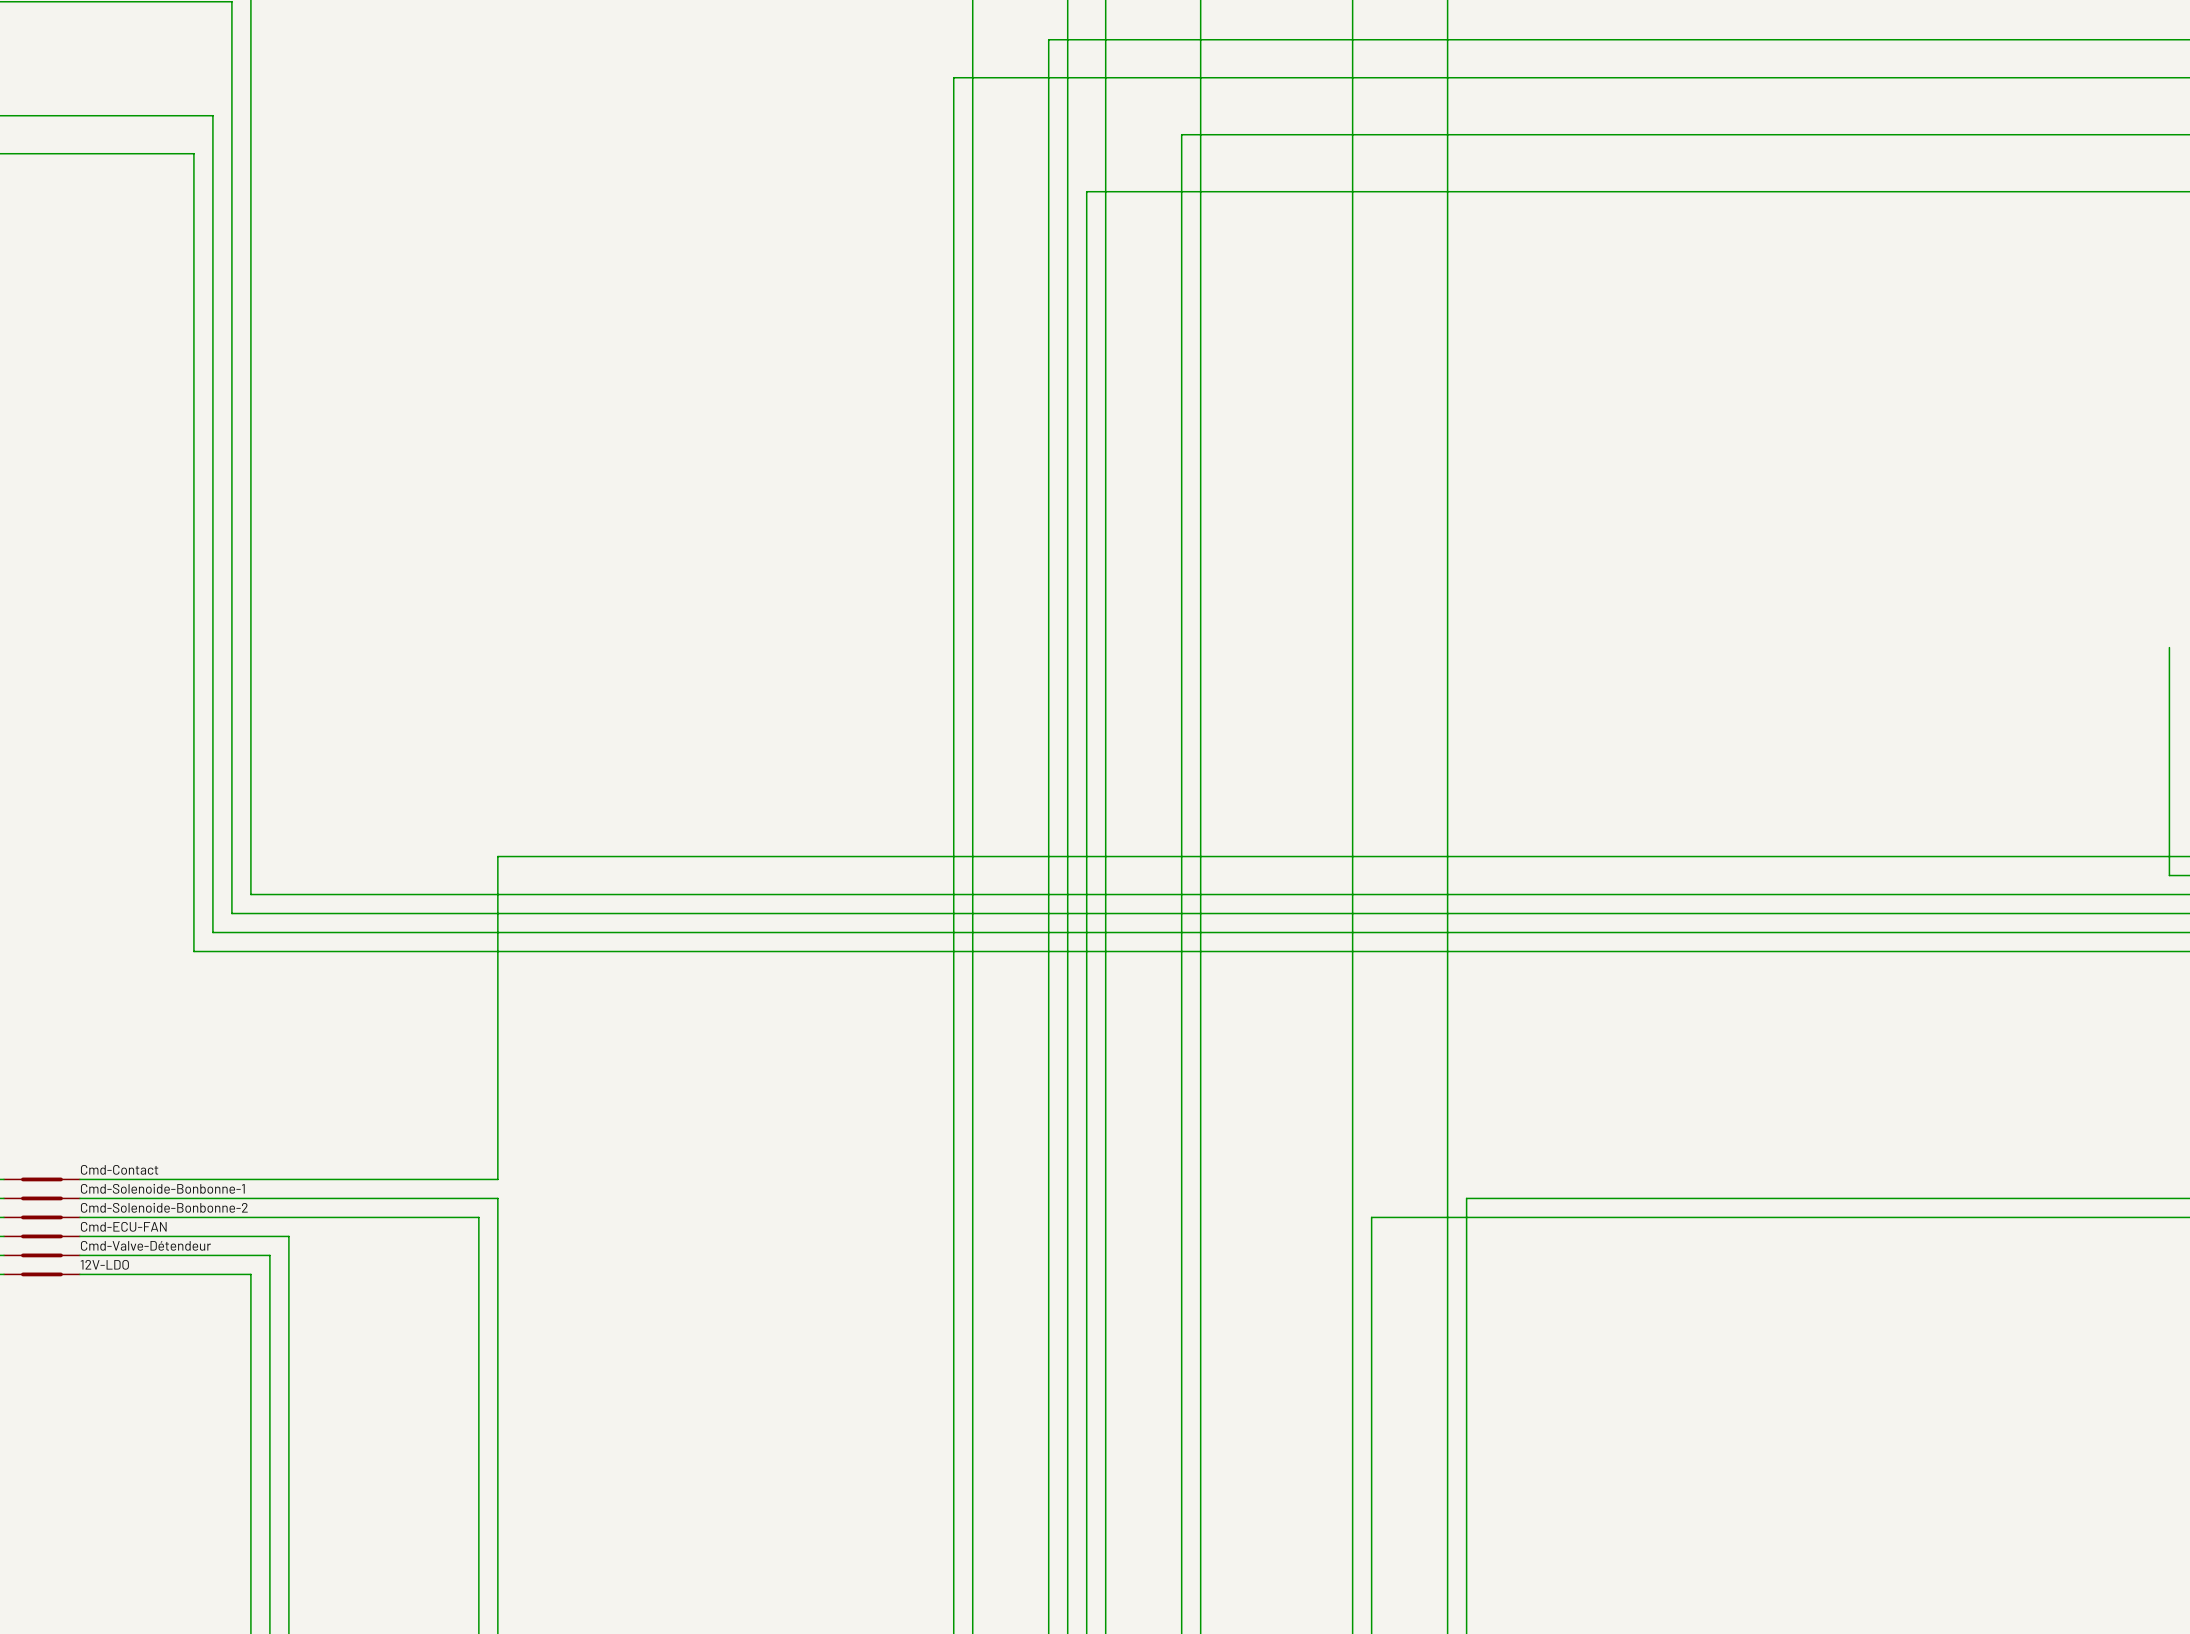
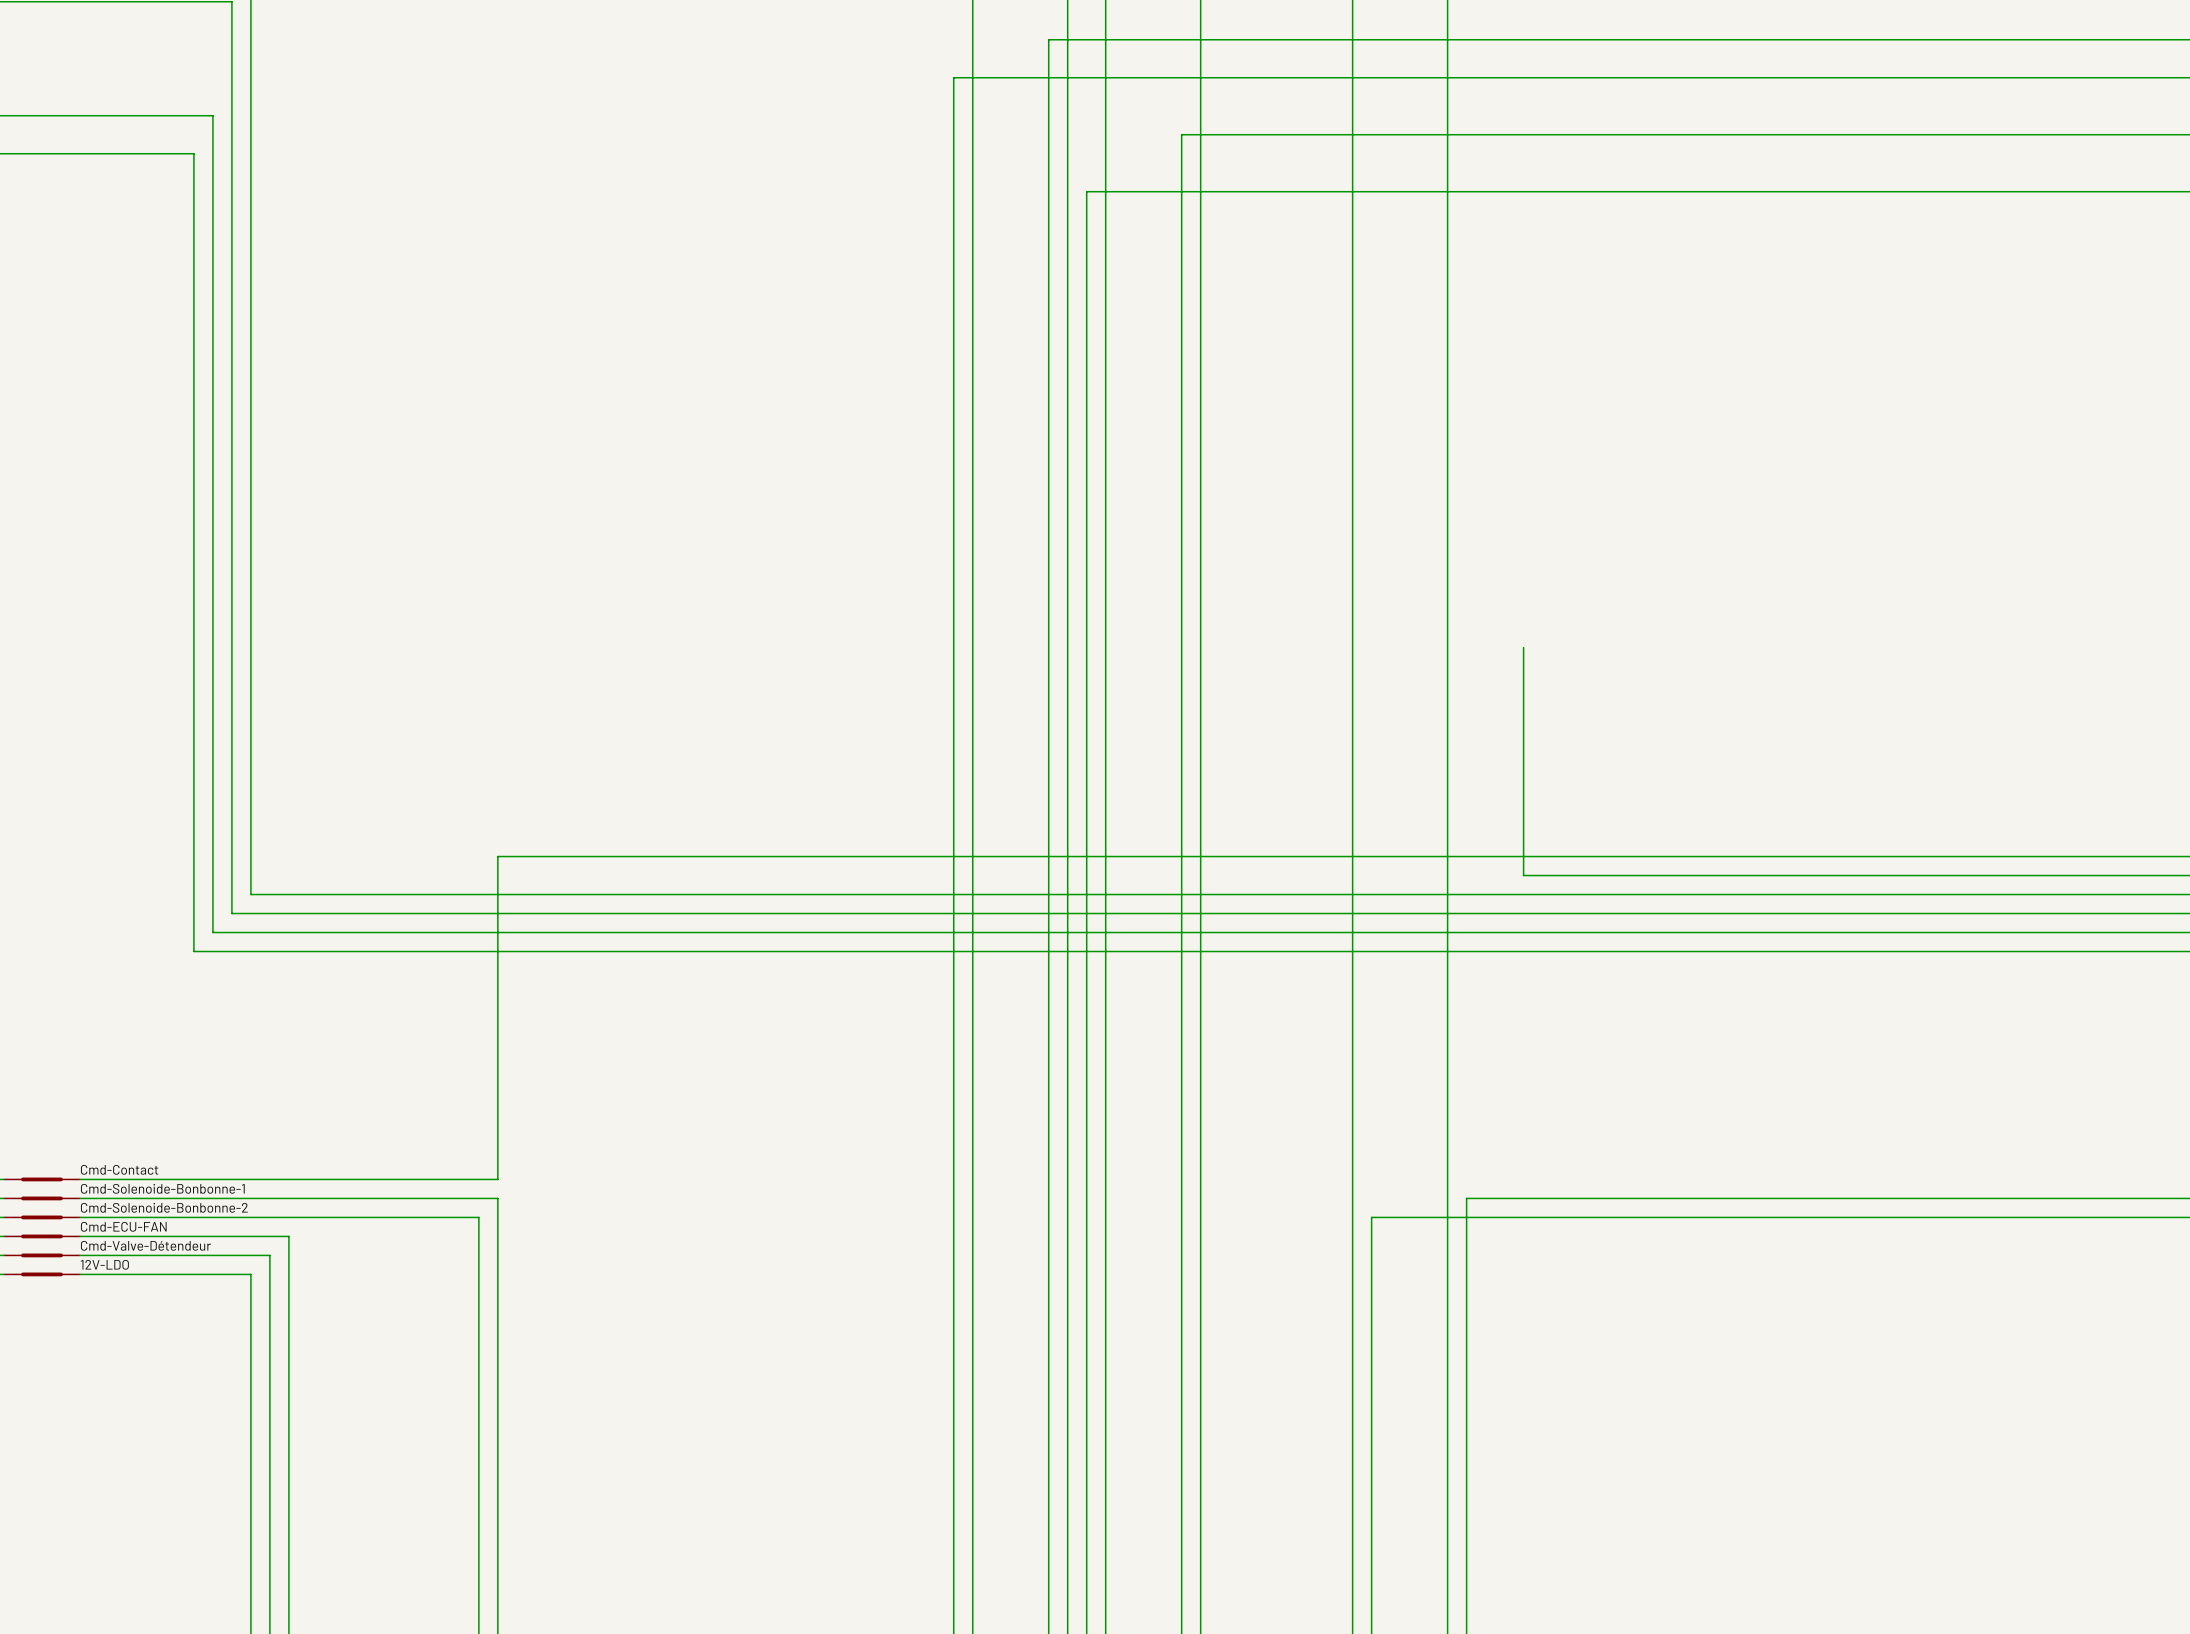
wire: (2169, 647) (2169, 875) -> (1523, 647) (1523, 875) (2169, 875)

